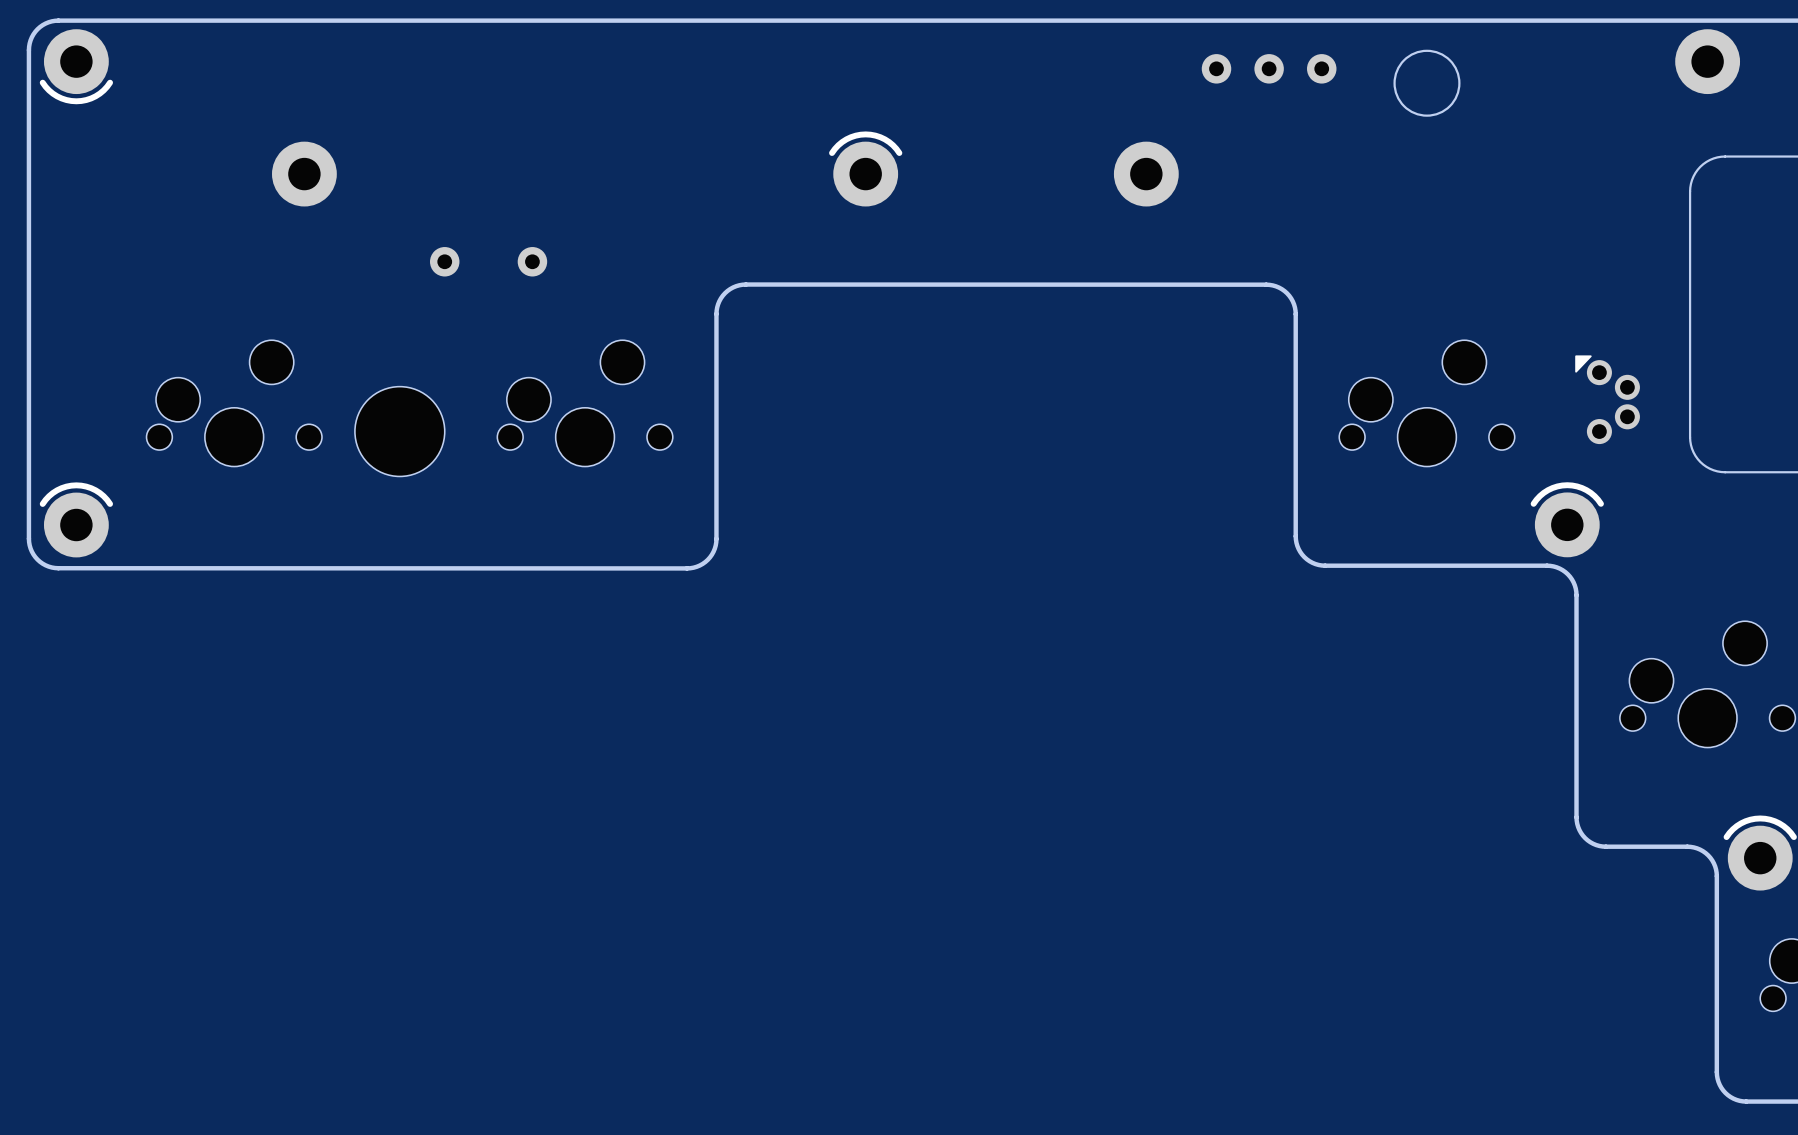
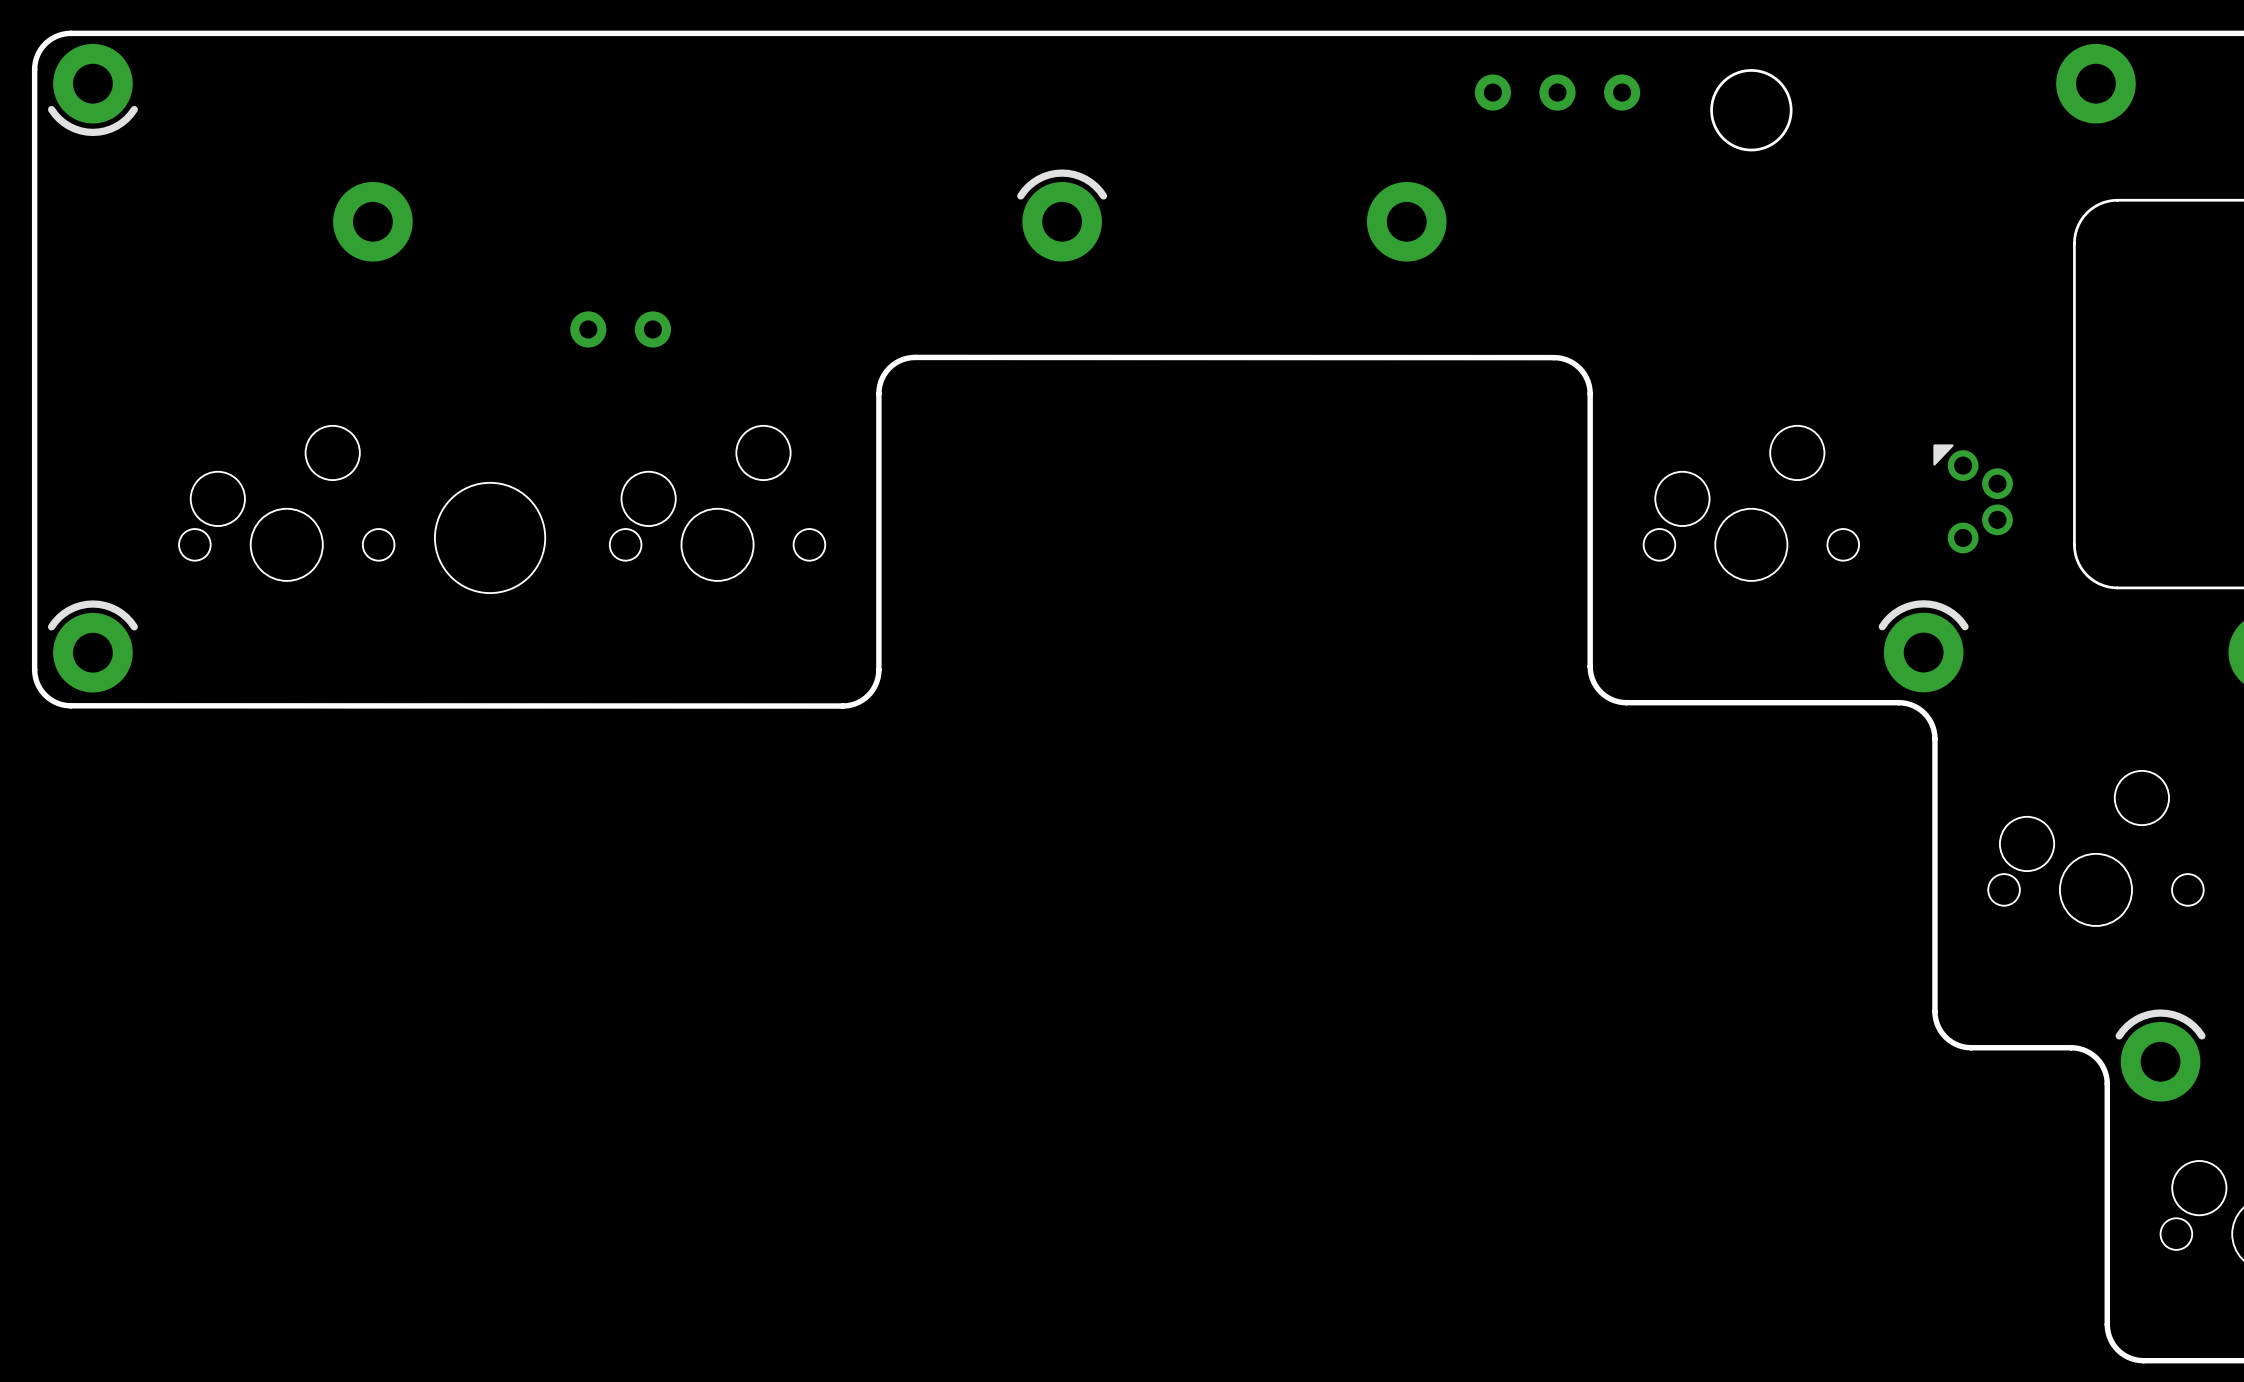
part position: (444, 261) -> (588, 329)

